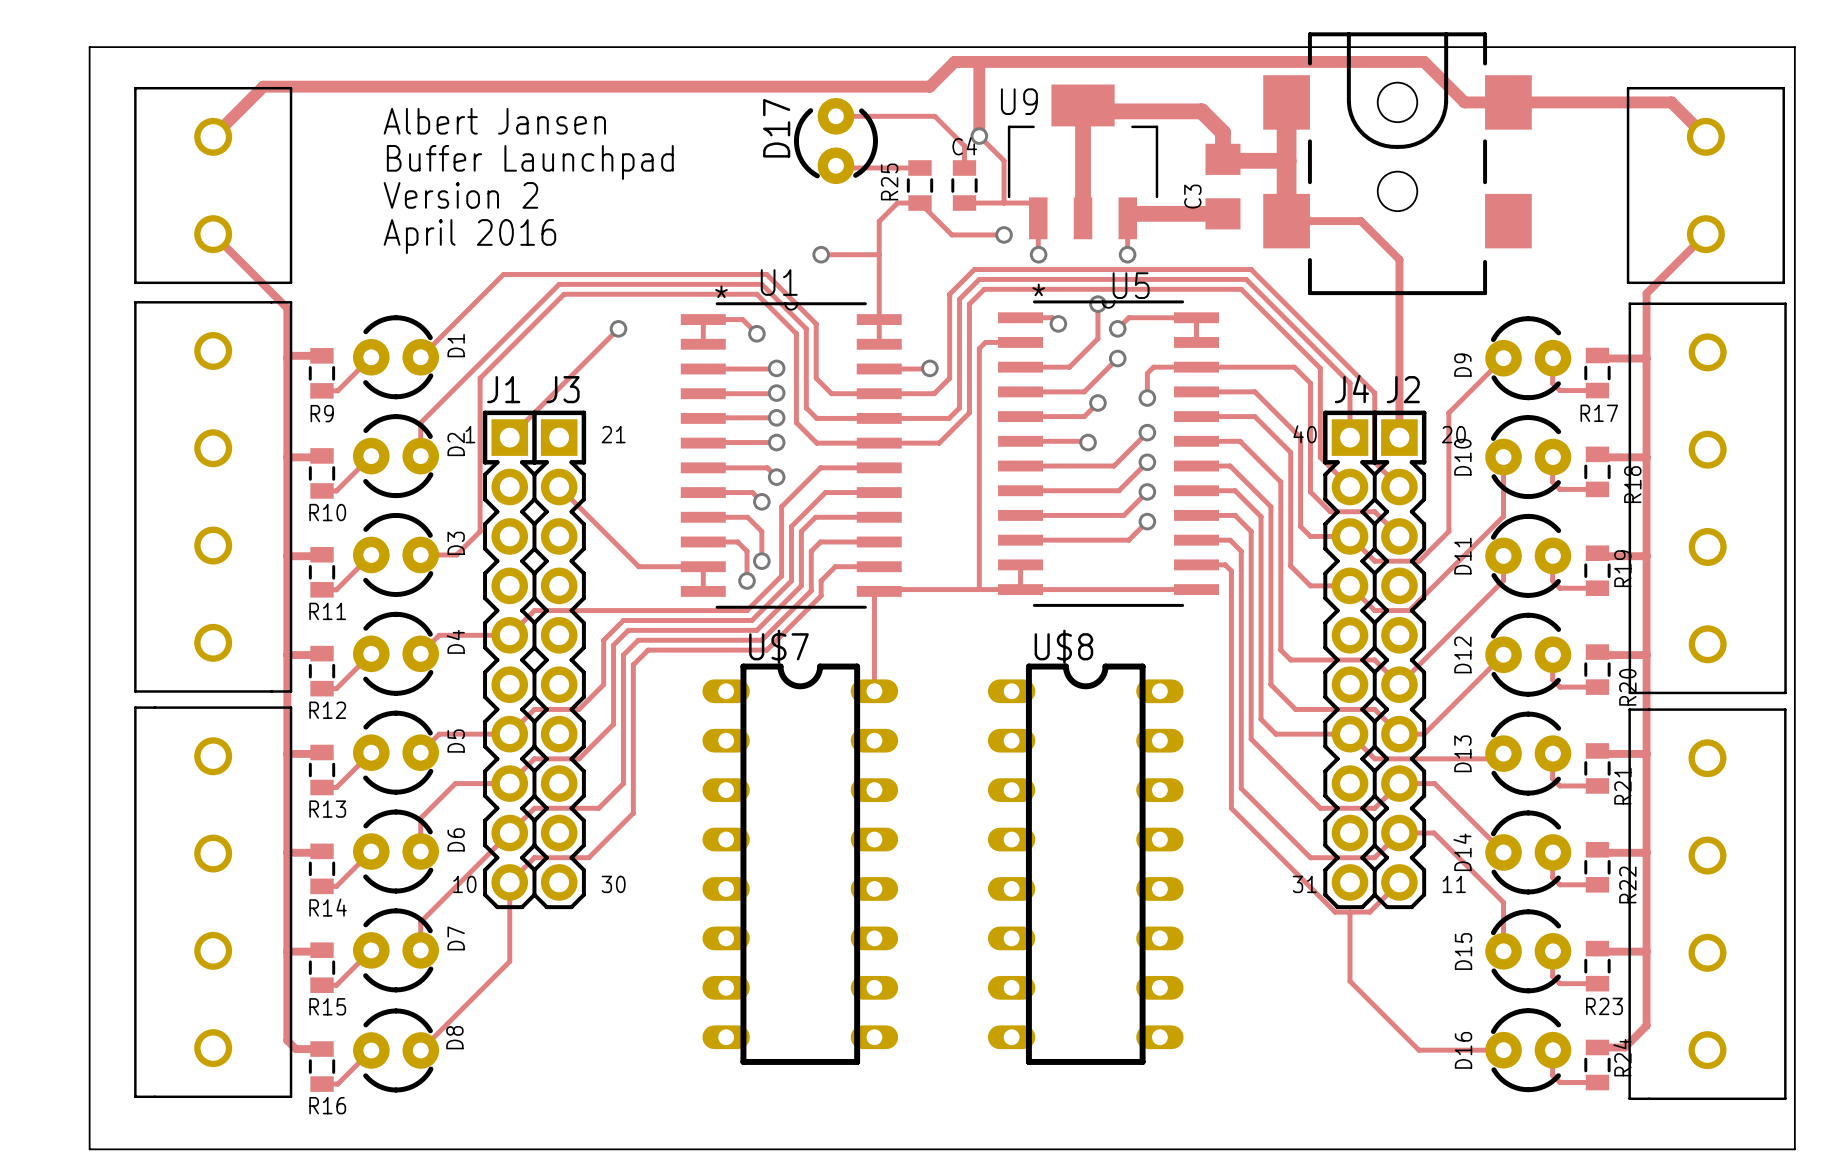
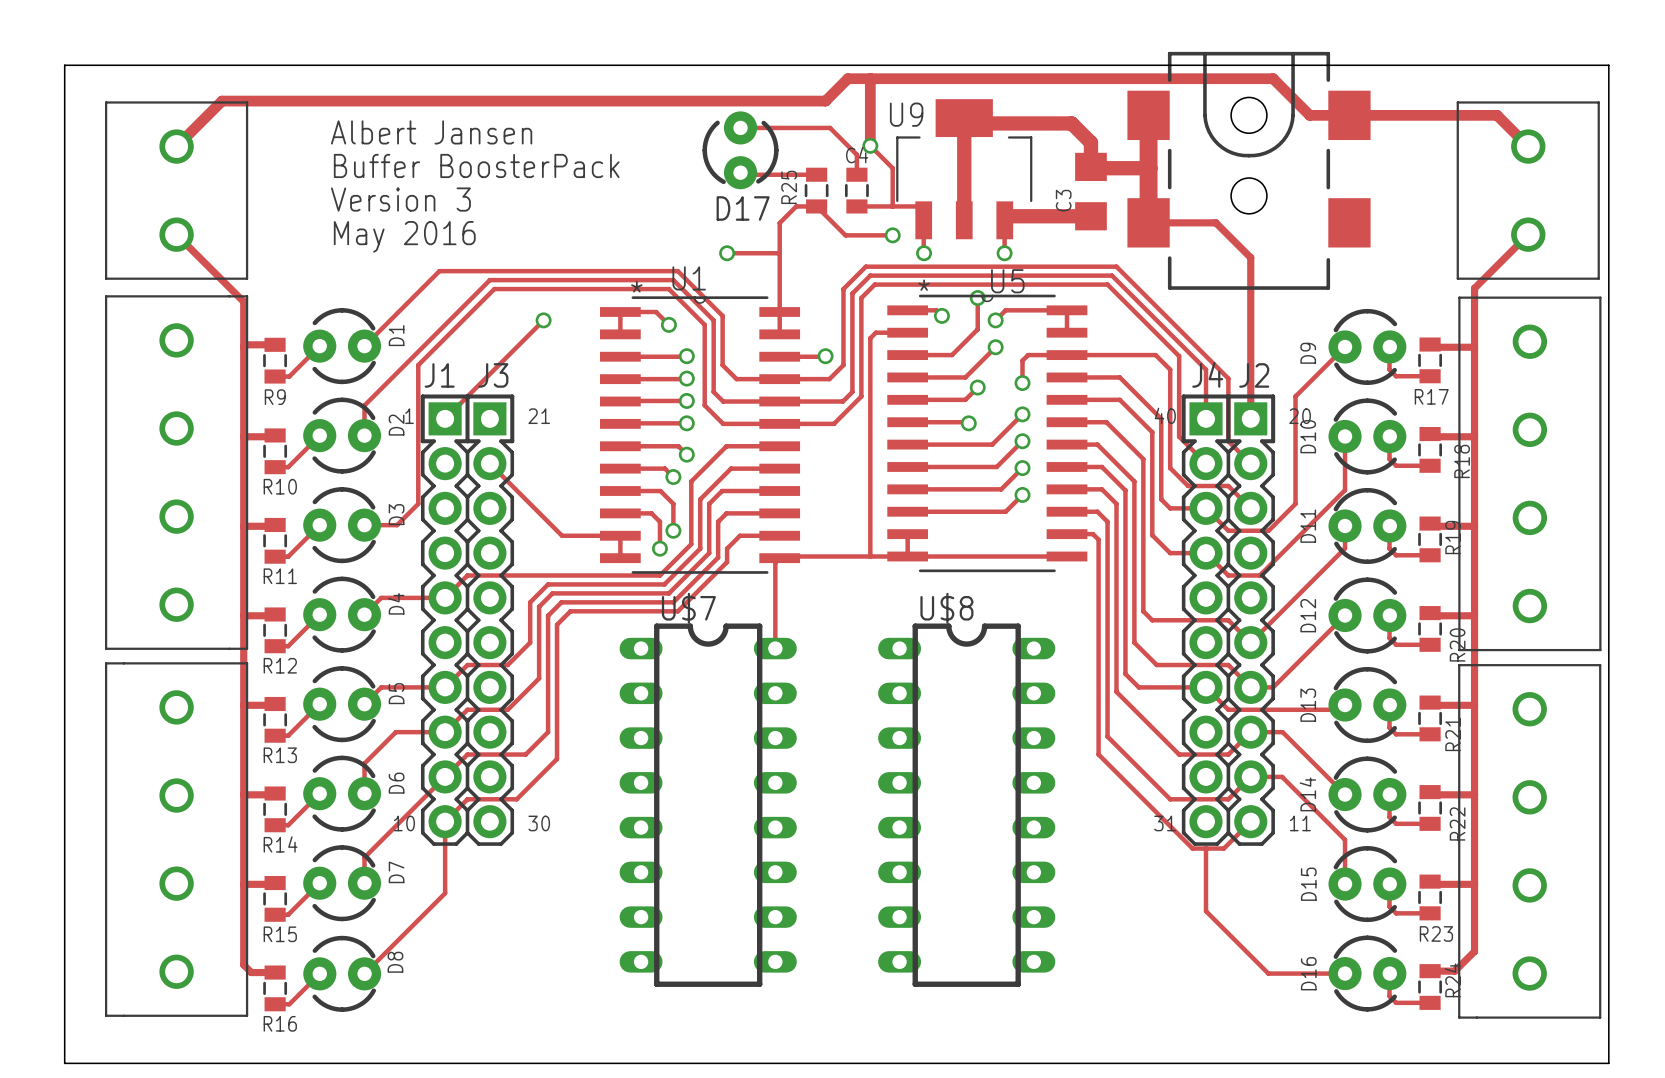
D17 name rotation: 0° (776, 128) -> 90° clockwise (743, 208)
D17 name position: D17 (776, 128) -> D17 (743, 208)
text: Buffer Launchpad (530, 162) -> Buffer BoosterPack (476, 165)
text: Version 2 (460, 195) -> Version 3 (400, 199)
text: April 2016 (469, 236) -> May 2016 (404, 236)

